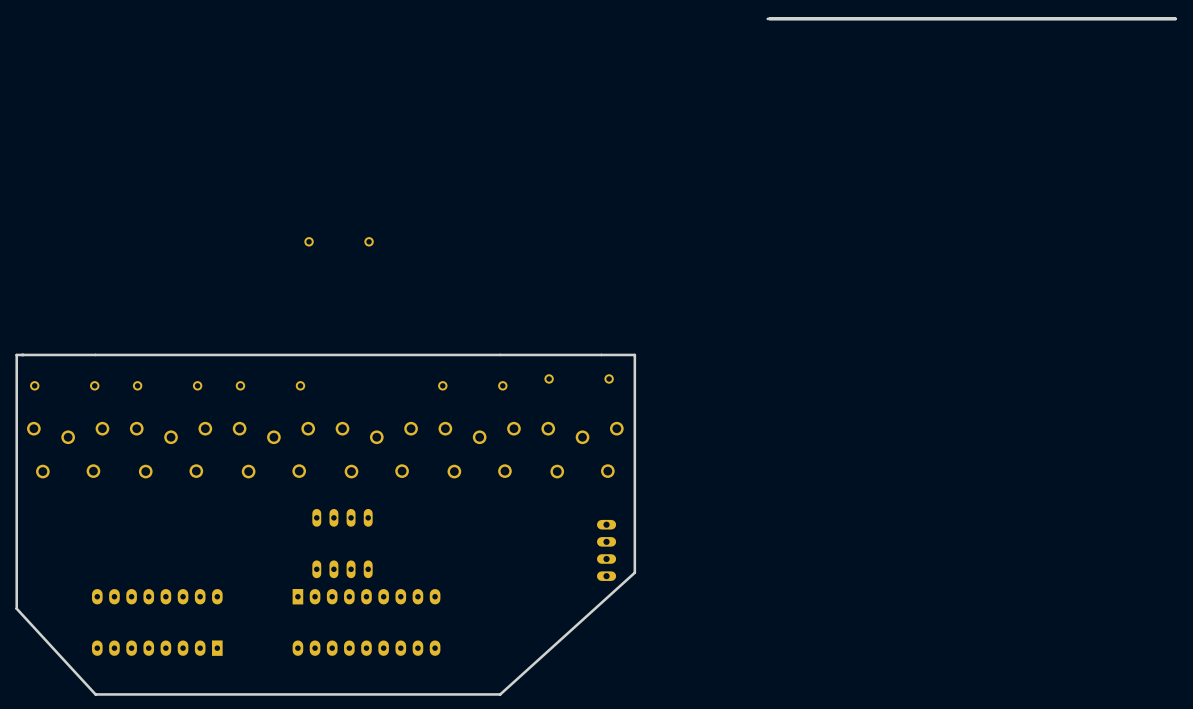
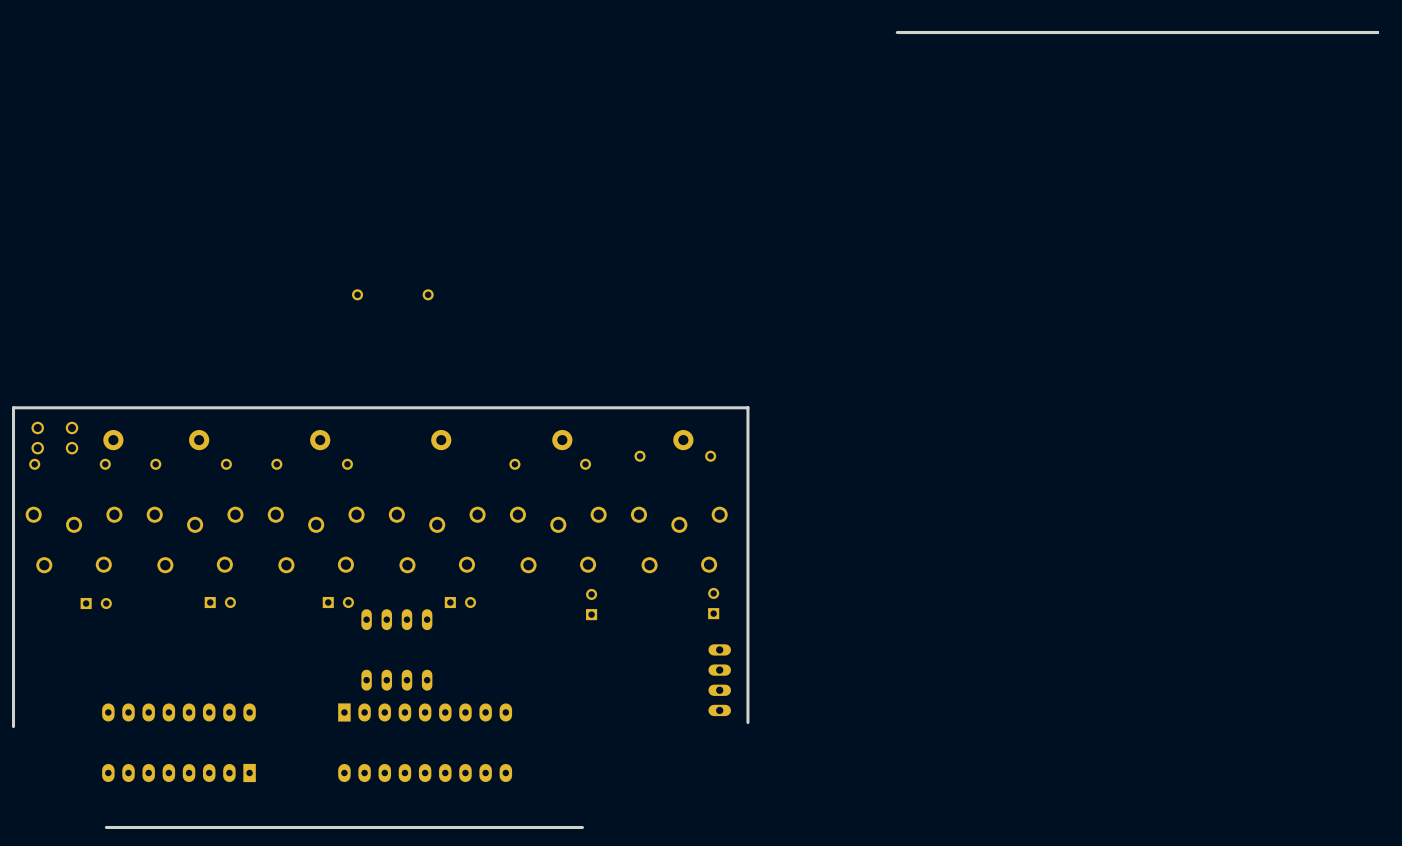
board edge: (16, 354) (634, 354) (634, 572) (500, 694) -> (13, 427) (13, 407) (747, 407) (747, 722)
part: none -> (37, 438)
part: none -> (72, 438)
part: none -> (113, 440)
part: none -> (199, 440)
part: none -> (320, 440)
part: none -> (441, 440)
part: none -> (562, 440)
part: none -> (683, 440)
part: none -> (220, 602)
part: none -> (338, 602)
part: none -> (460, 602)
part: none -> (96, 603)
part: none -> (591, 604)
part: none -> (713, 603)
part position: (606, 550) -> (719, 680)
board edge: (16, 608) (95, 694) -> none

